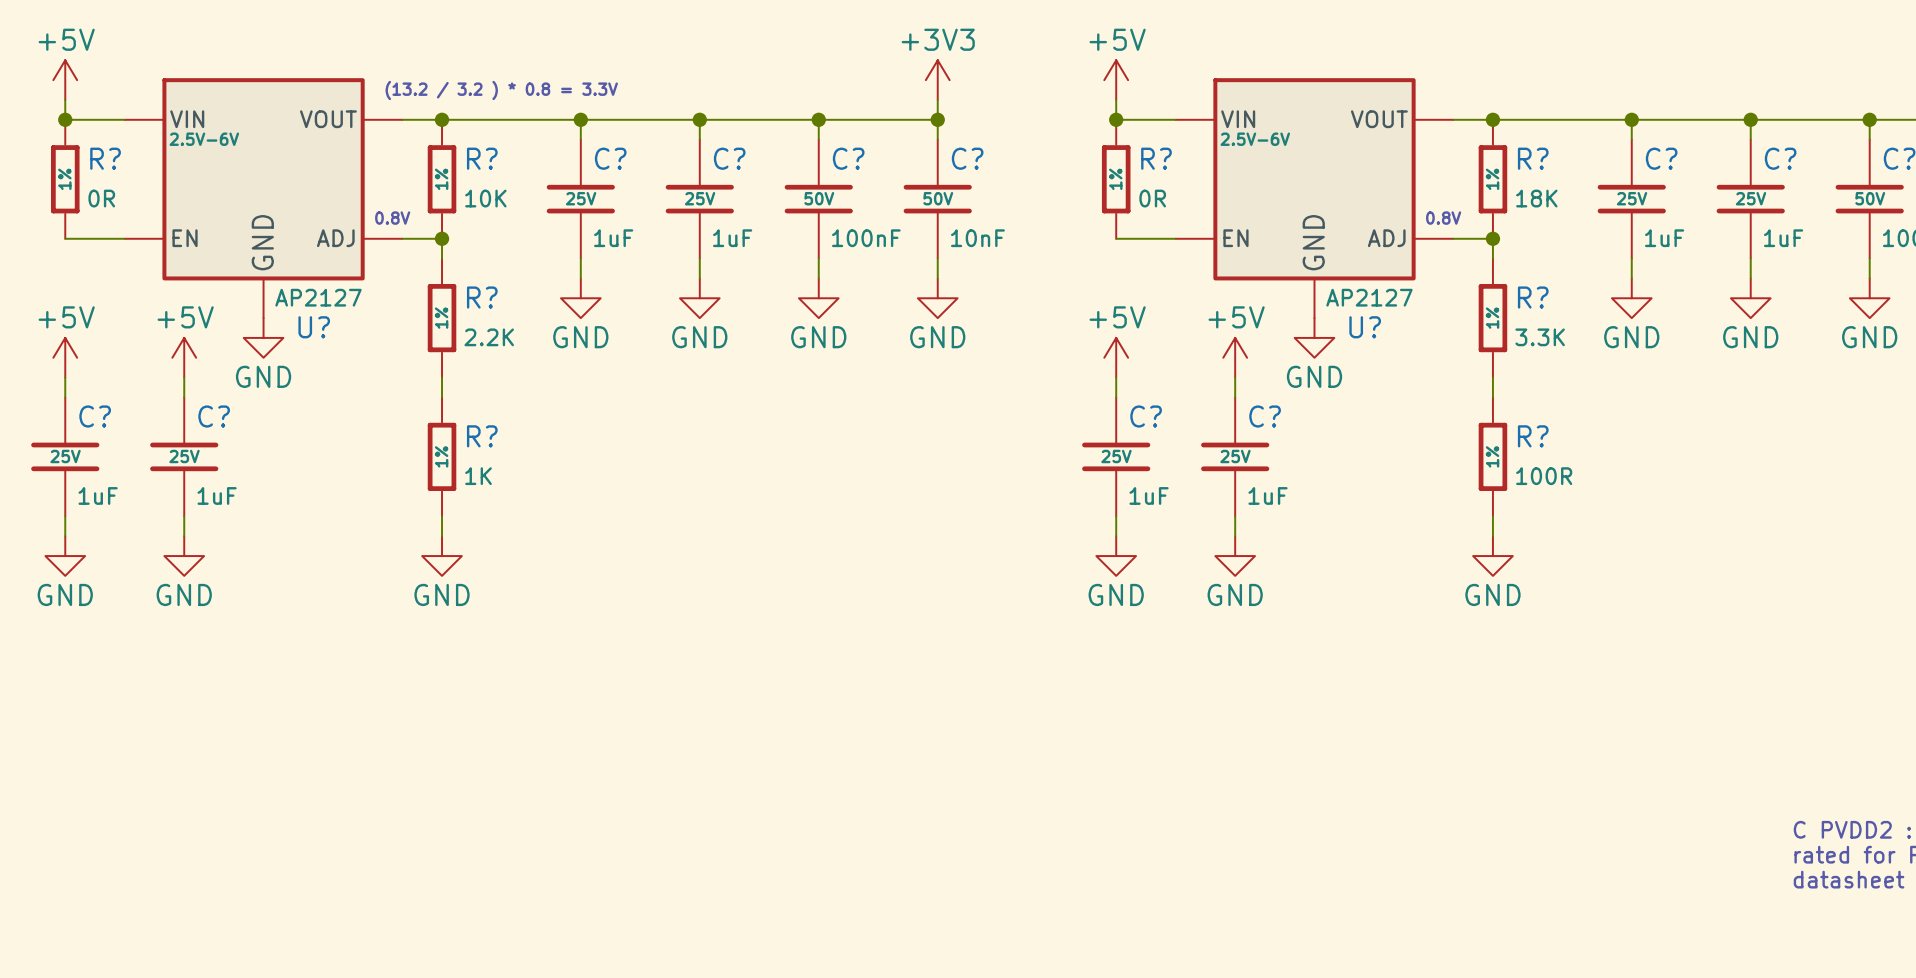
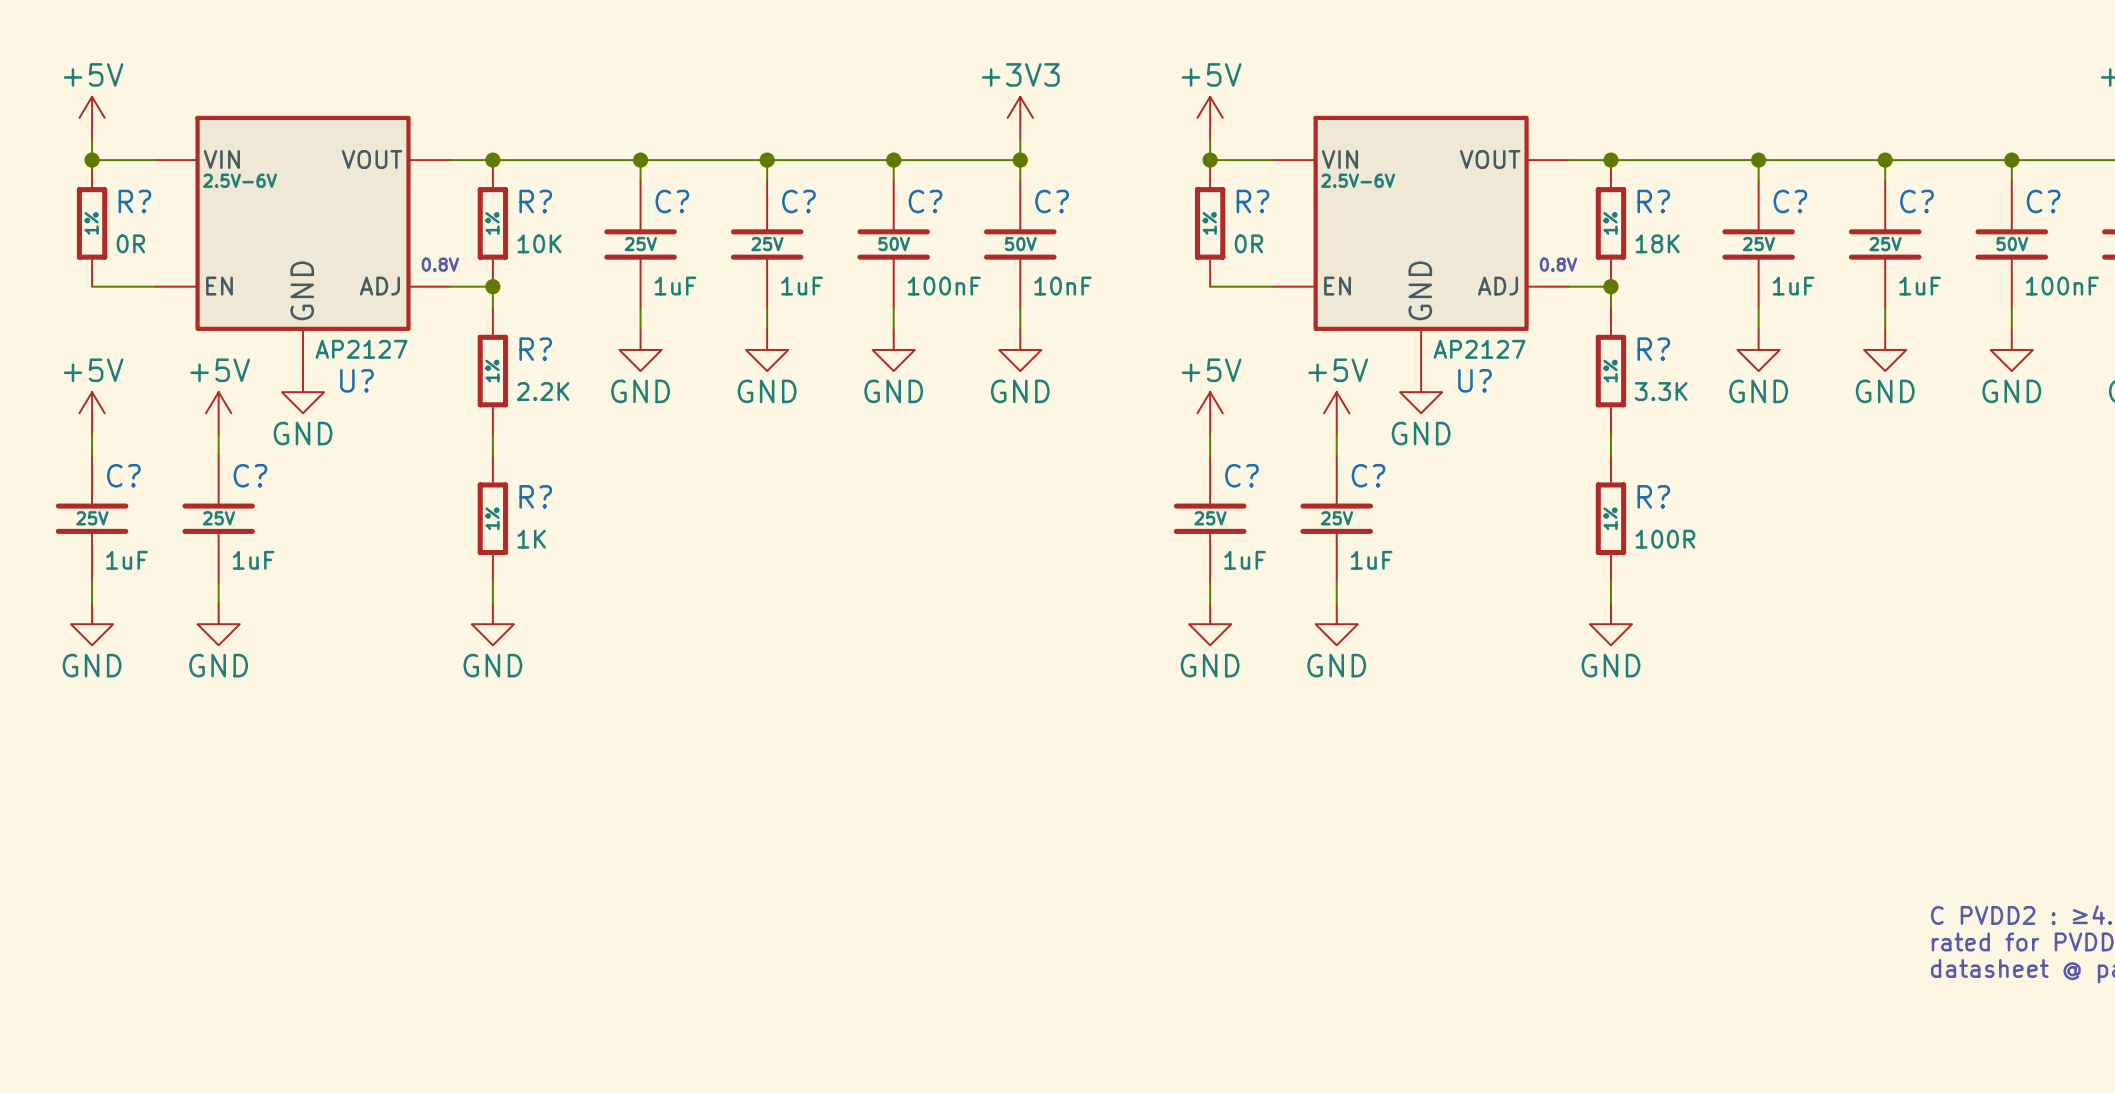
text: (13.2 / 3.2 ) * 0.8 = 3.3V (501, 90) -> none

